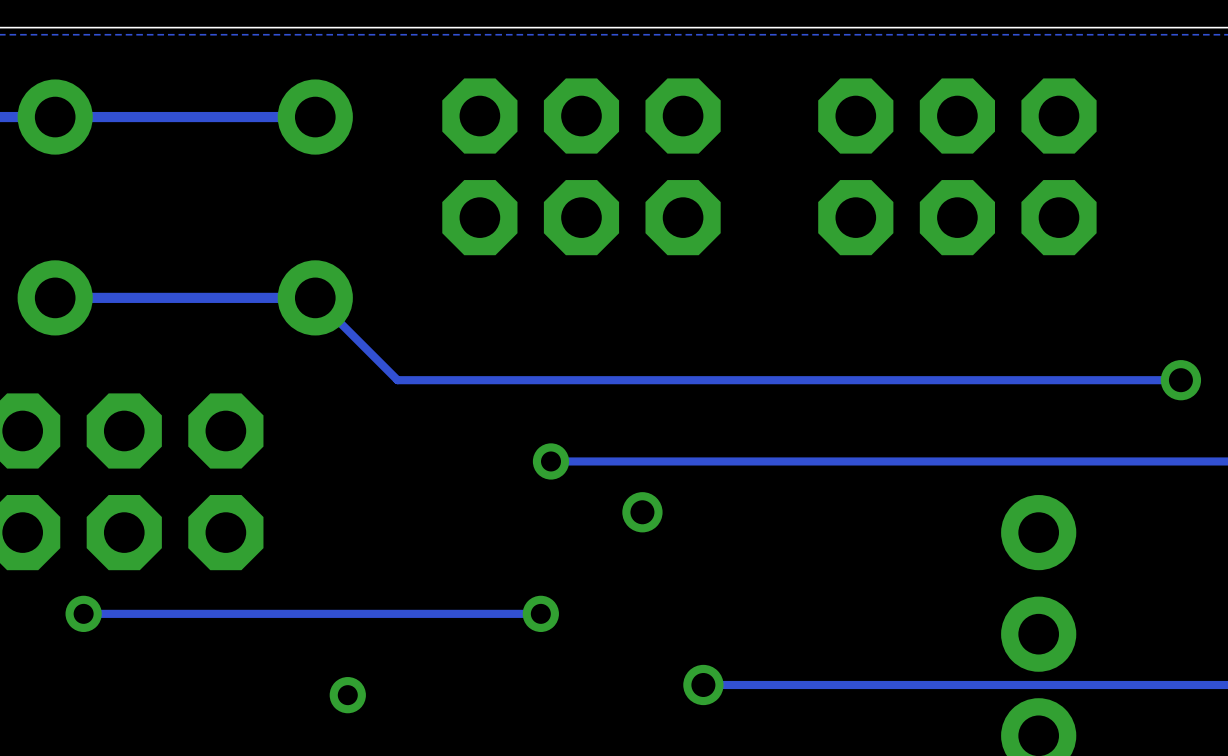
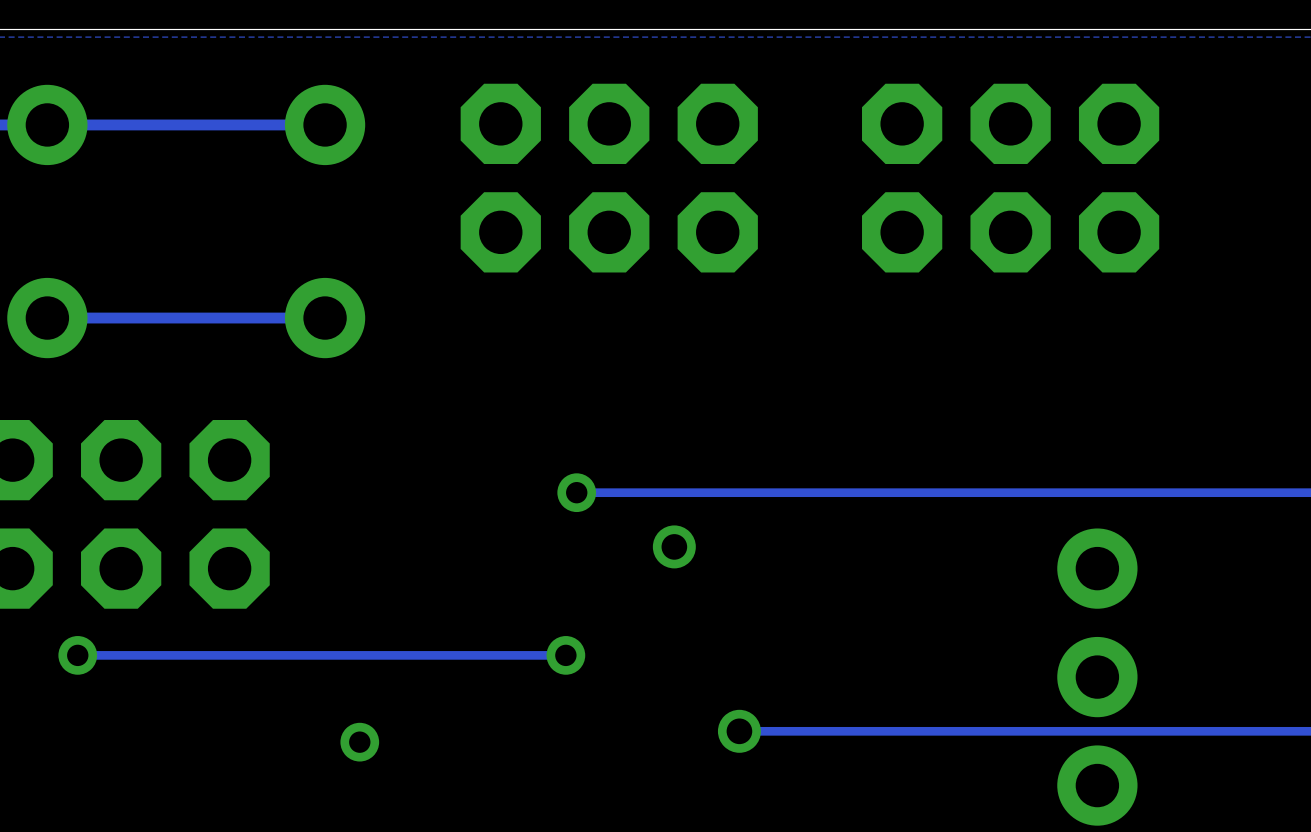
track: (315, 297) (397, 380) (1180, 380) -> none
via: (1180, 380) -> none

